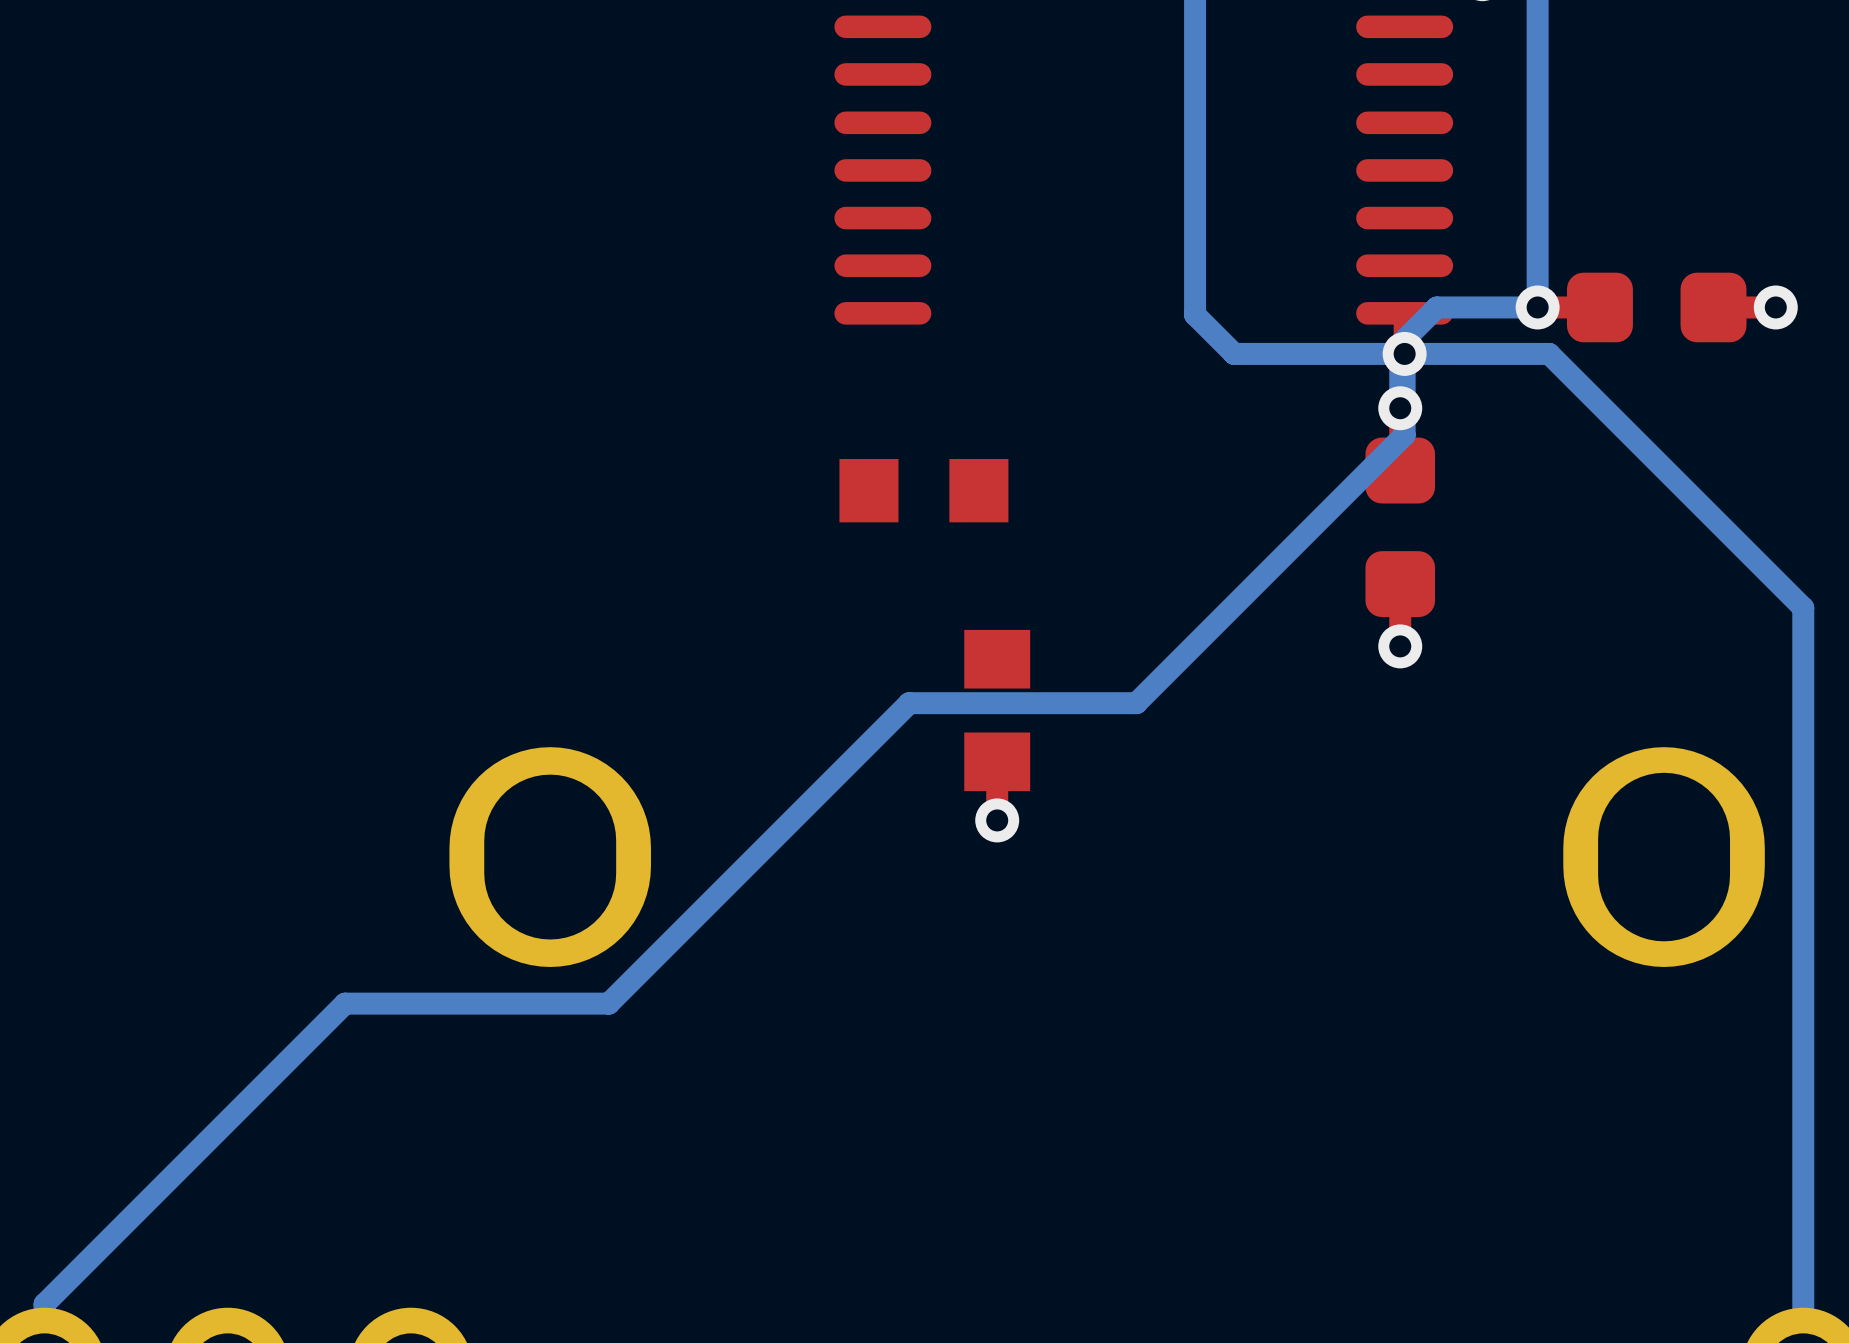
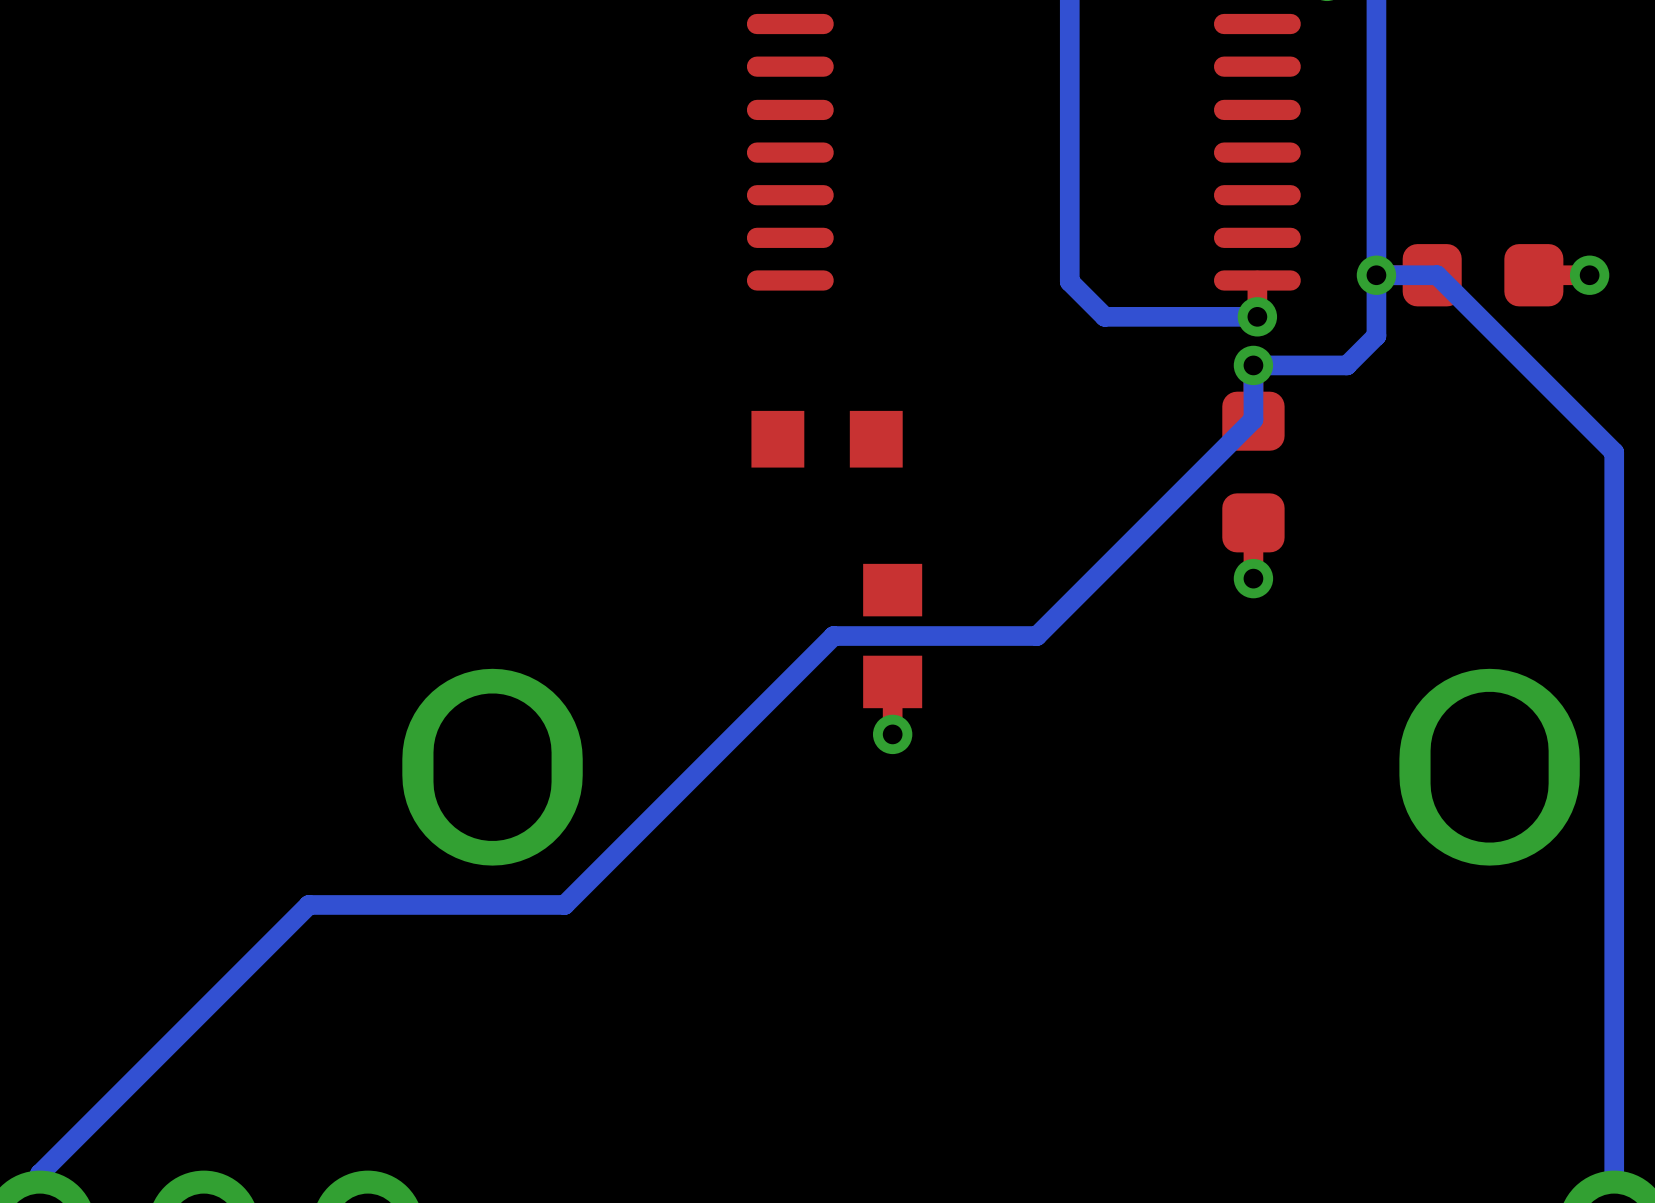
bottom track: (1537, 307) (1436, 307) (1400, 344) (1400, 408) -> none
bottom track: (1803, 607) (1549, 353) (1404, 353) (1404, 434) (1136, 703) (909, 703) (608, 1003) (345, 1003) (44, 1304) (44, 1311) -> (1614, 544) (1614, 452) (1437, 275) (1376, 275) (1376, 335) (1346, 365) (1253, 365) (1253, 419) (1036, 636) (833, 636) (564, 904) (308, 904) (39, 1173)

